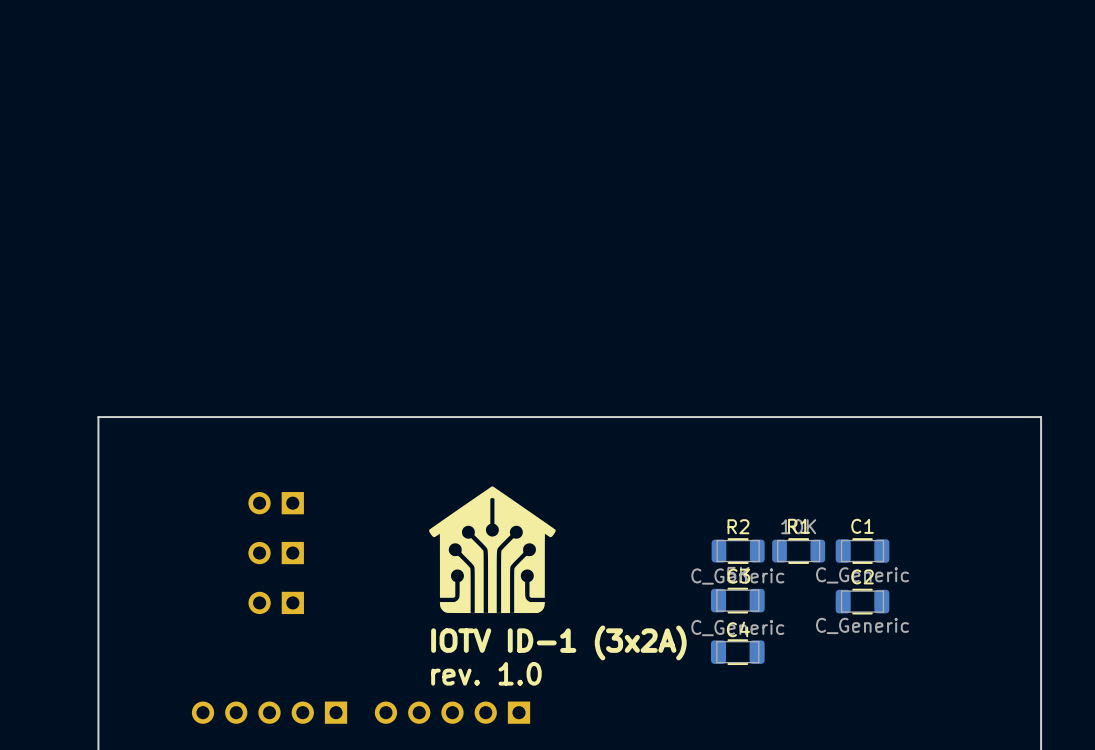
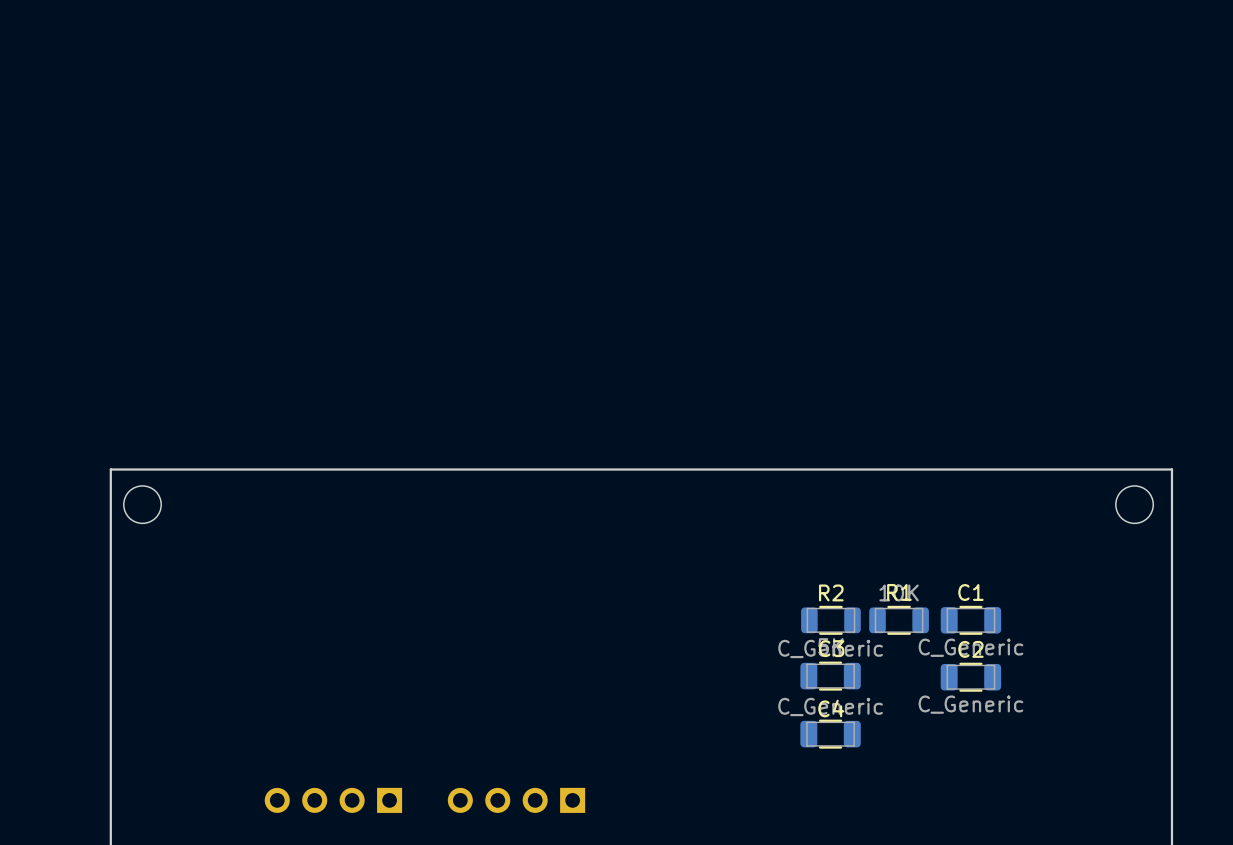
round board edge: none -> [123, 485, 162, 525]
round board edge: none -> [1115, 485, 1155, 525]
drawing: [429, 486, 556, 614] -> none
part: (276, 503) -> none
part: (276, 553) -> none
part: (276, 602) -> none
text: IOTV ID-1 (3x2A) (558, 642) -> none
text: rev. 1.0 (486, 673) -> none
part footprint: [374, 701, 531, 724] -> [447, 787, 586, 813]
part: none -> (333, 800)
part: (269, 712) -> none

